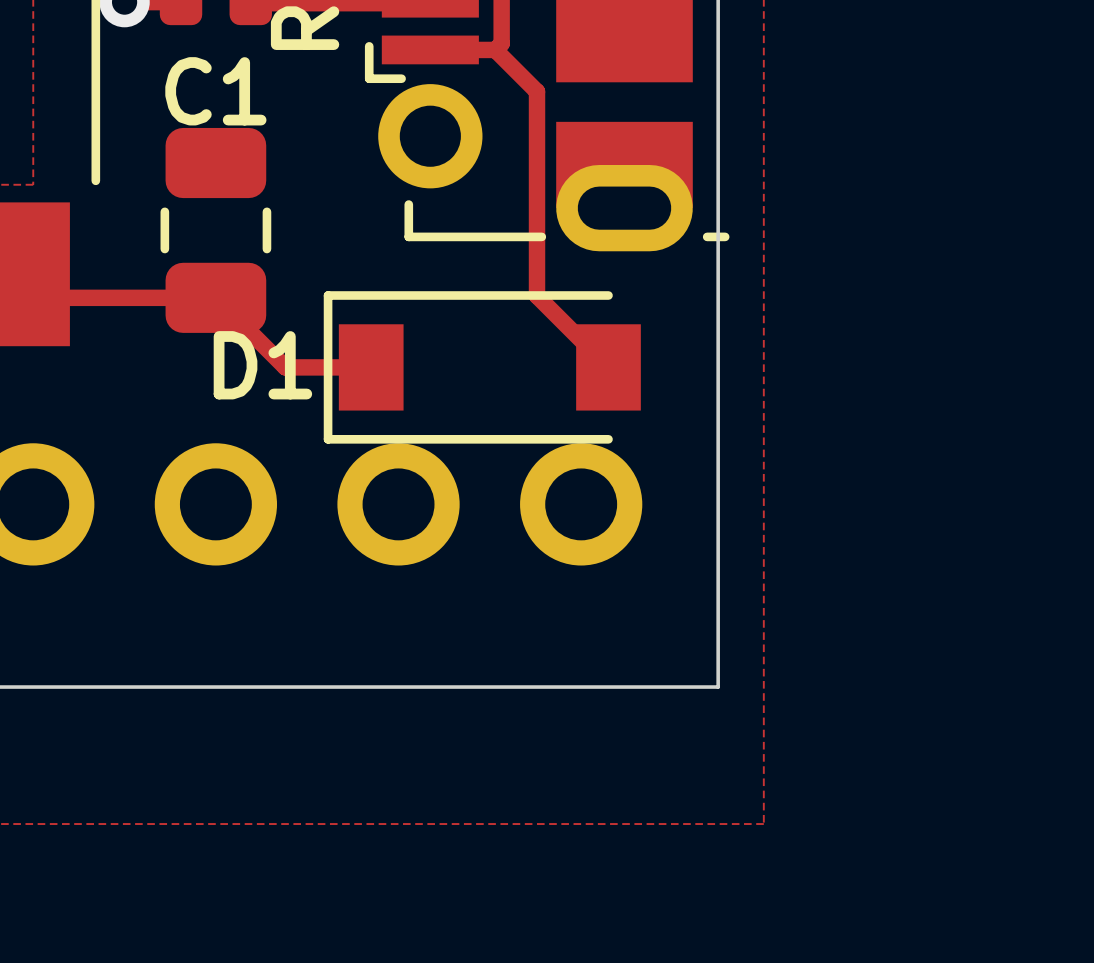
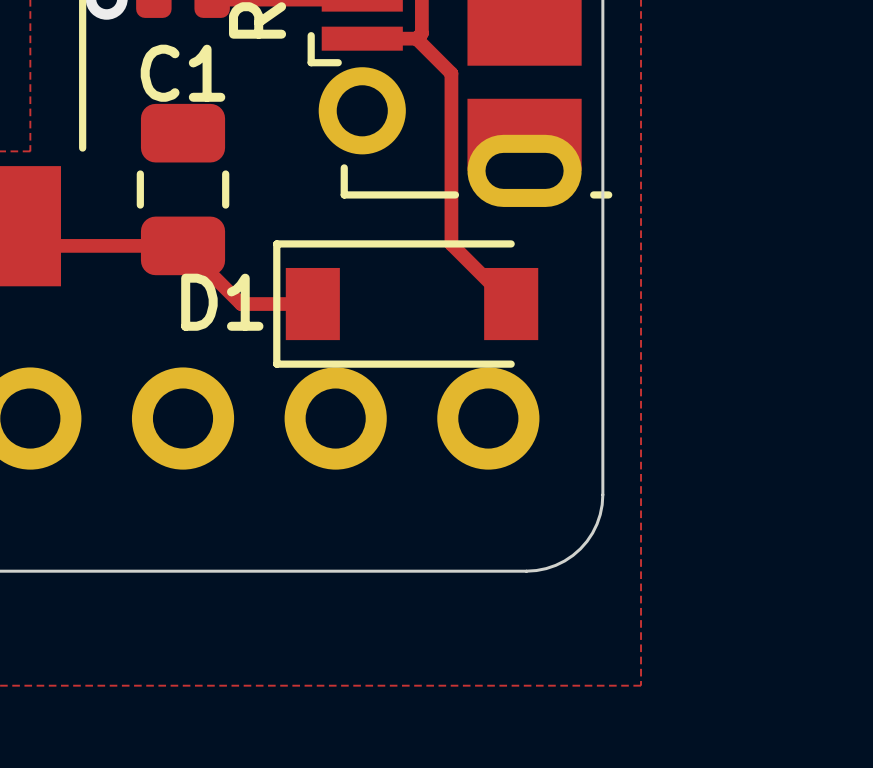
board edge: (718, 595) (718, 687) (626, 687) -> (602, 494) (597, 524) (580, 548) (555, 565) (526, 571)

